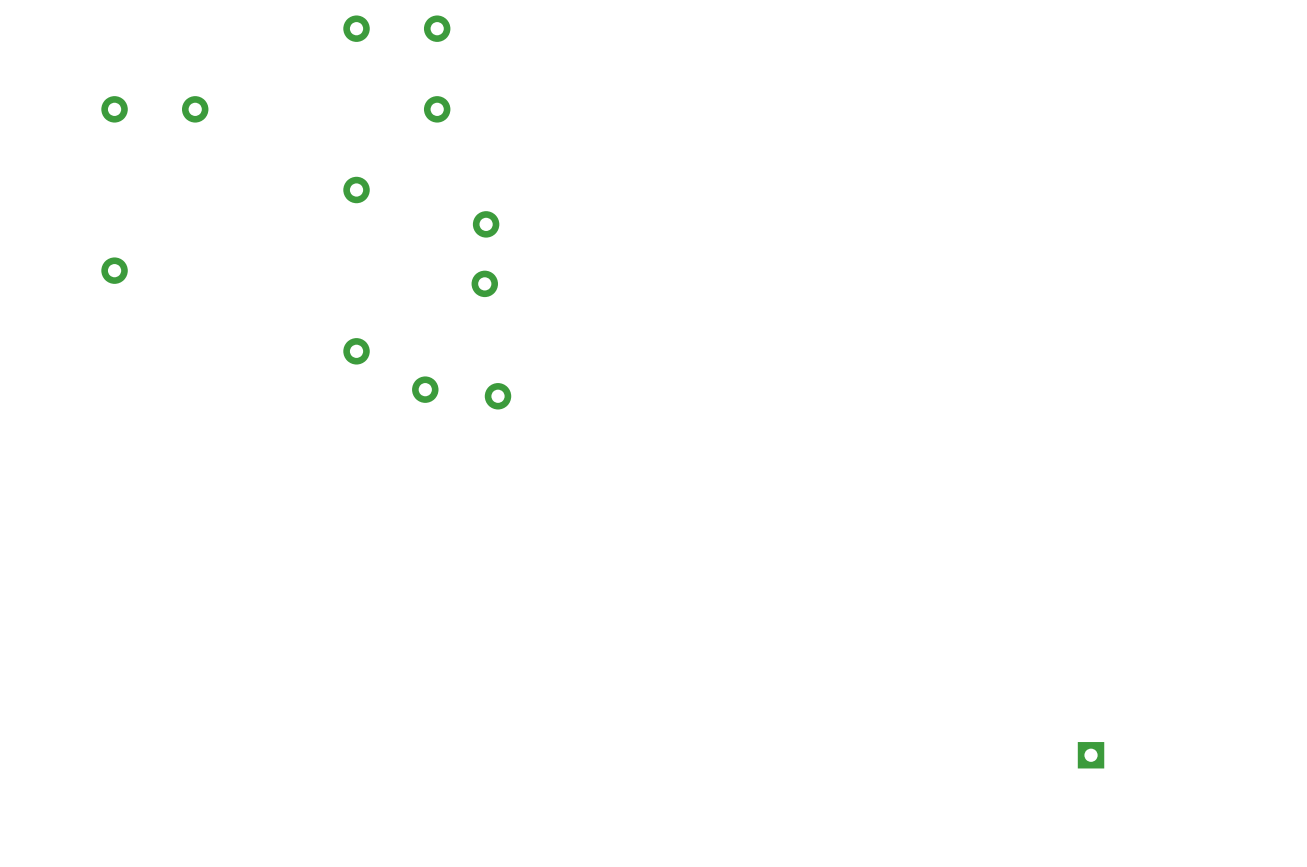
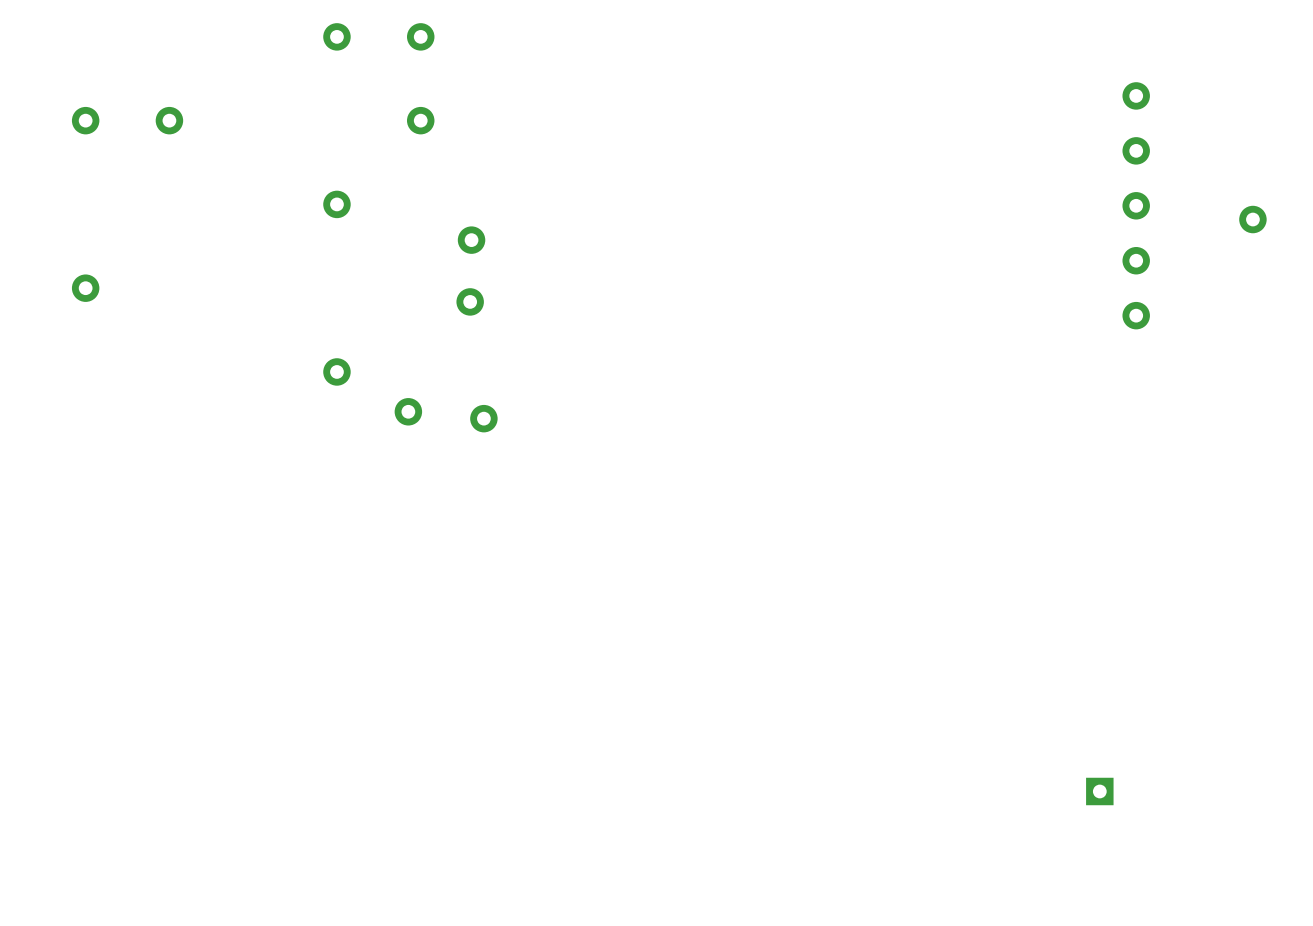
part: none -> (1136, 95)
part: none -> (1136, 150)
part: none -> (1136, 205)
part: none -> (1252, 219)
part: none -> (1136, 260)
part: none -> (1136, 315)

